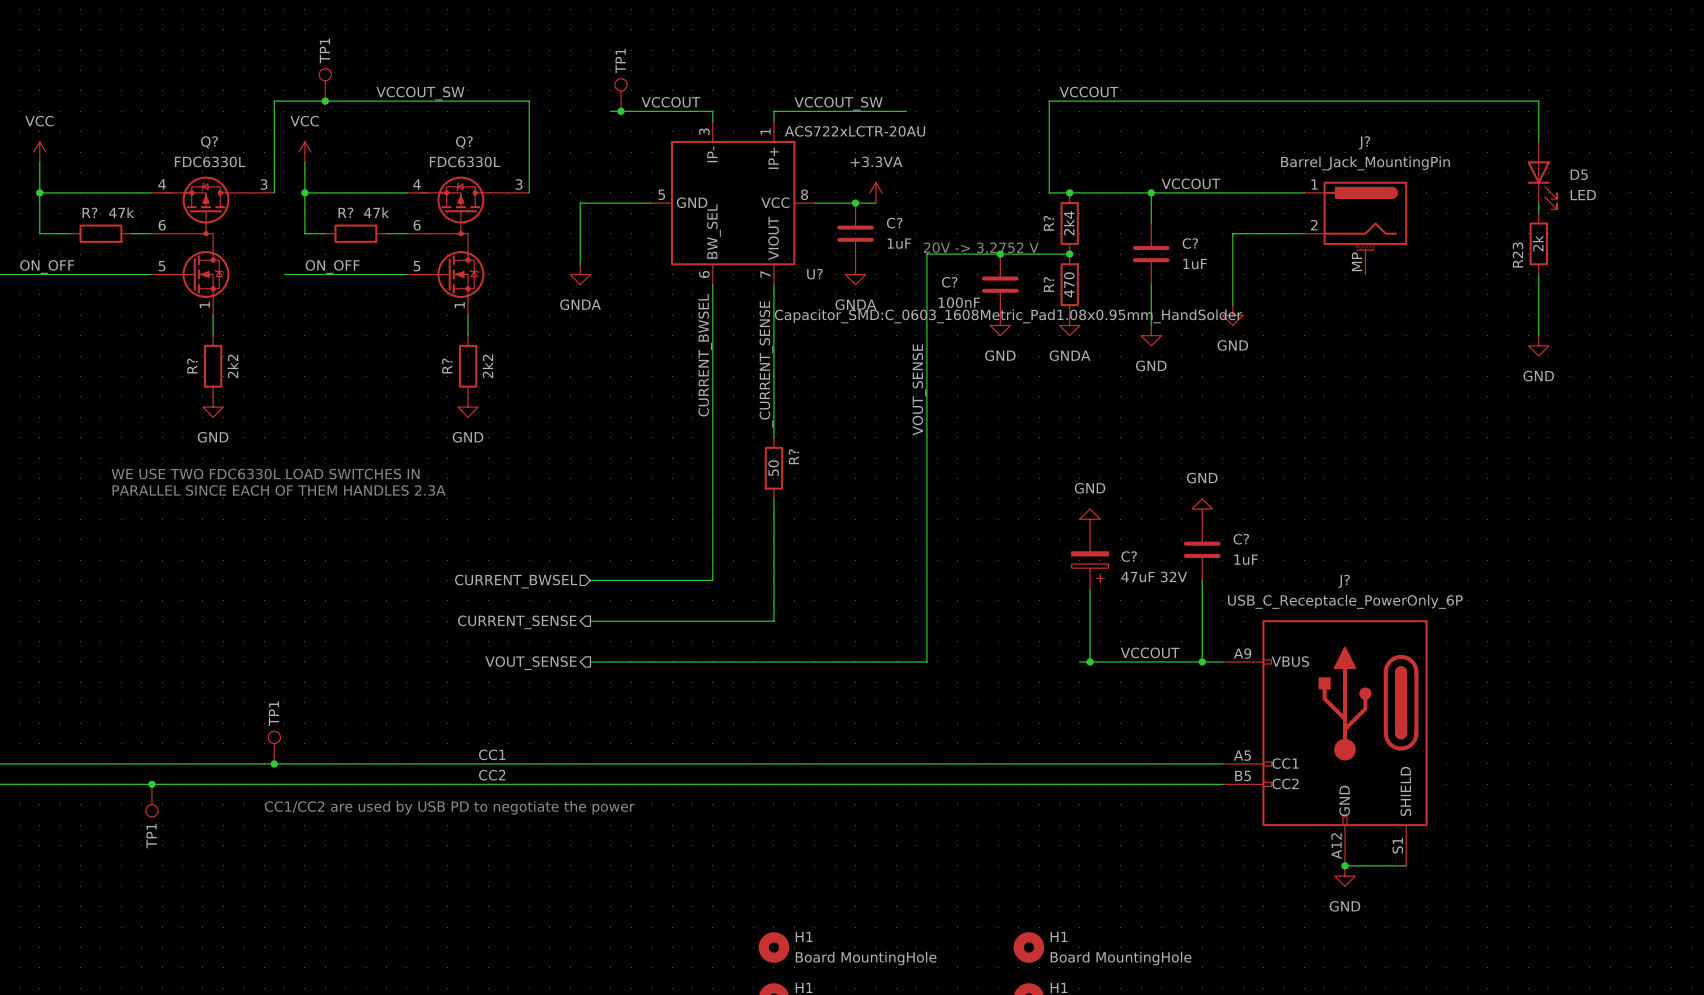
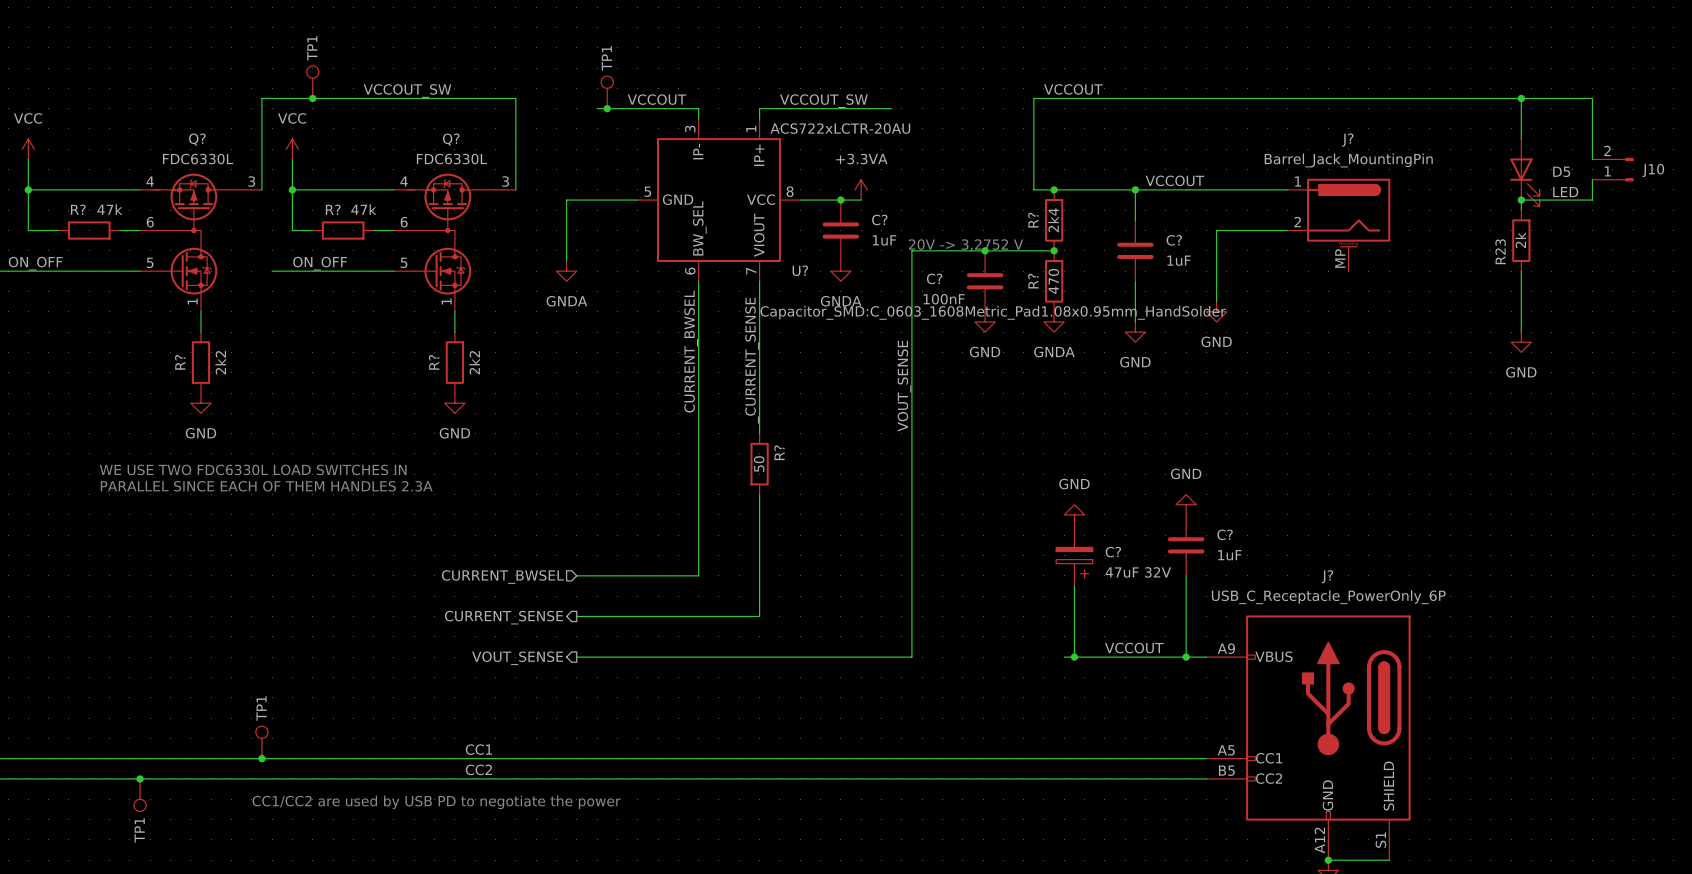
wire: none -> (1521, 98) (1592, 98) (1592, 159)
junction: none -> (1521, 98)
J10: none -> (1613, 169)
wire: none -> (1592, 179) (1592, 200) (1521, 200)
junction: none -> (1521, 200)

